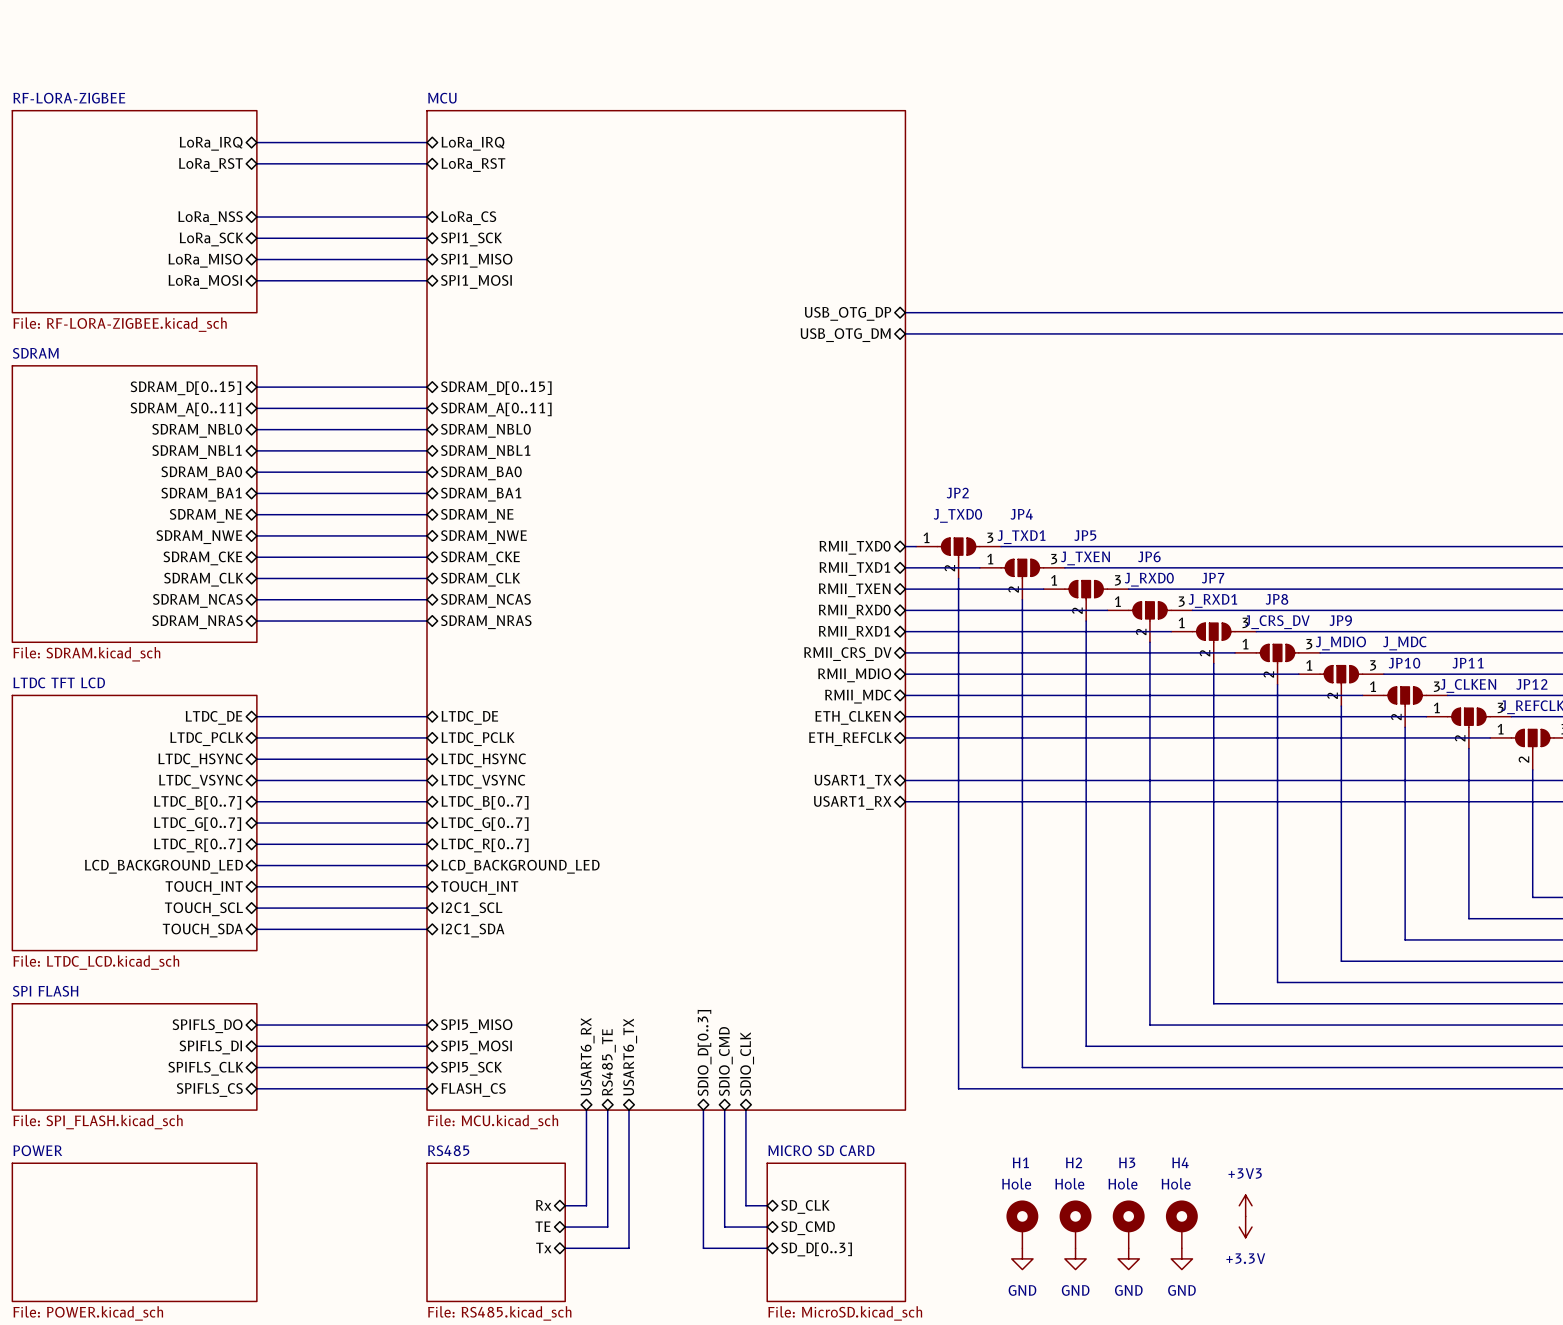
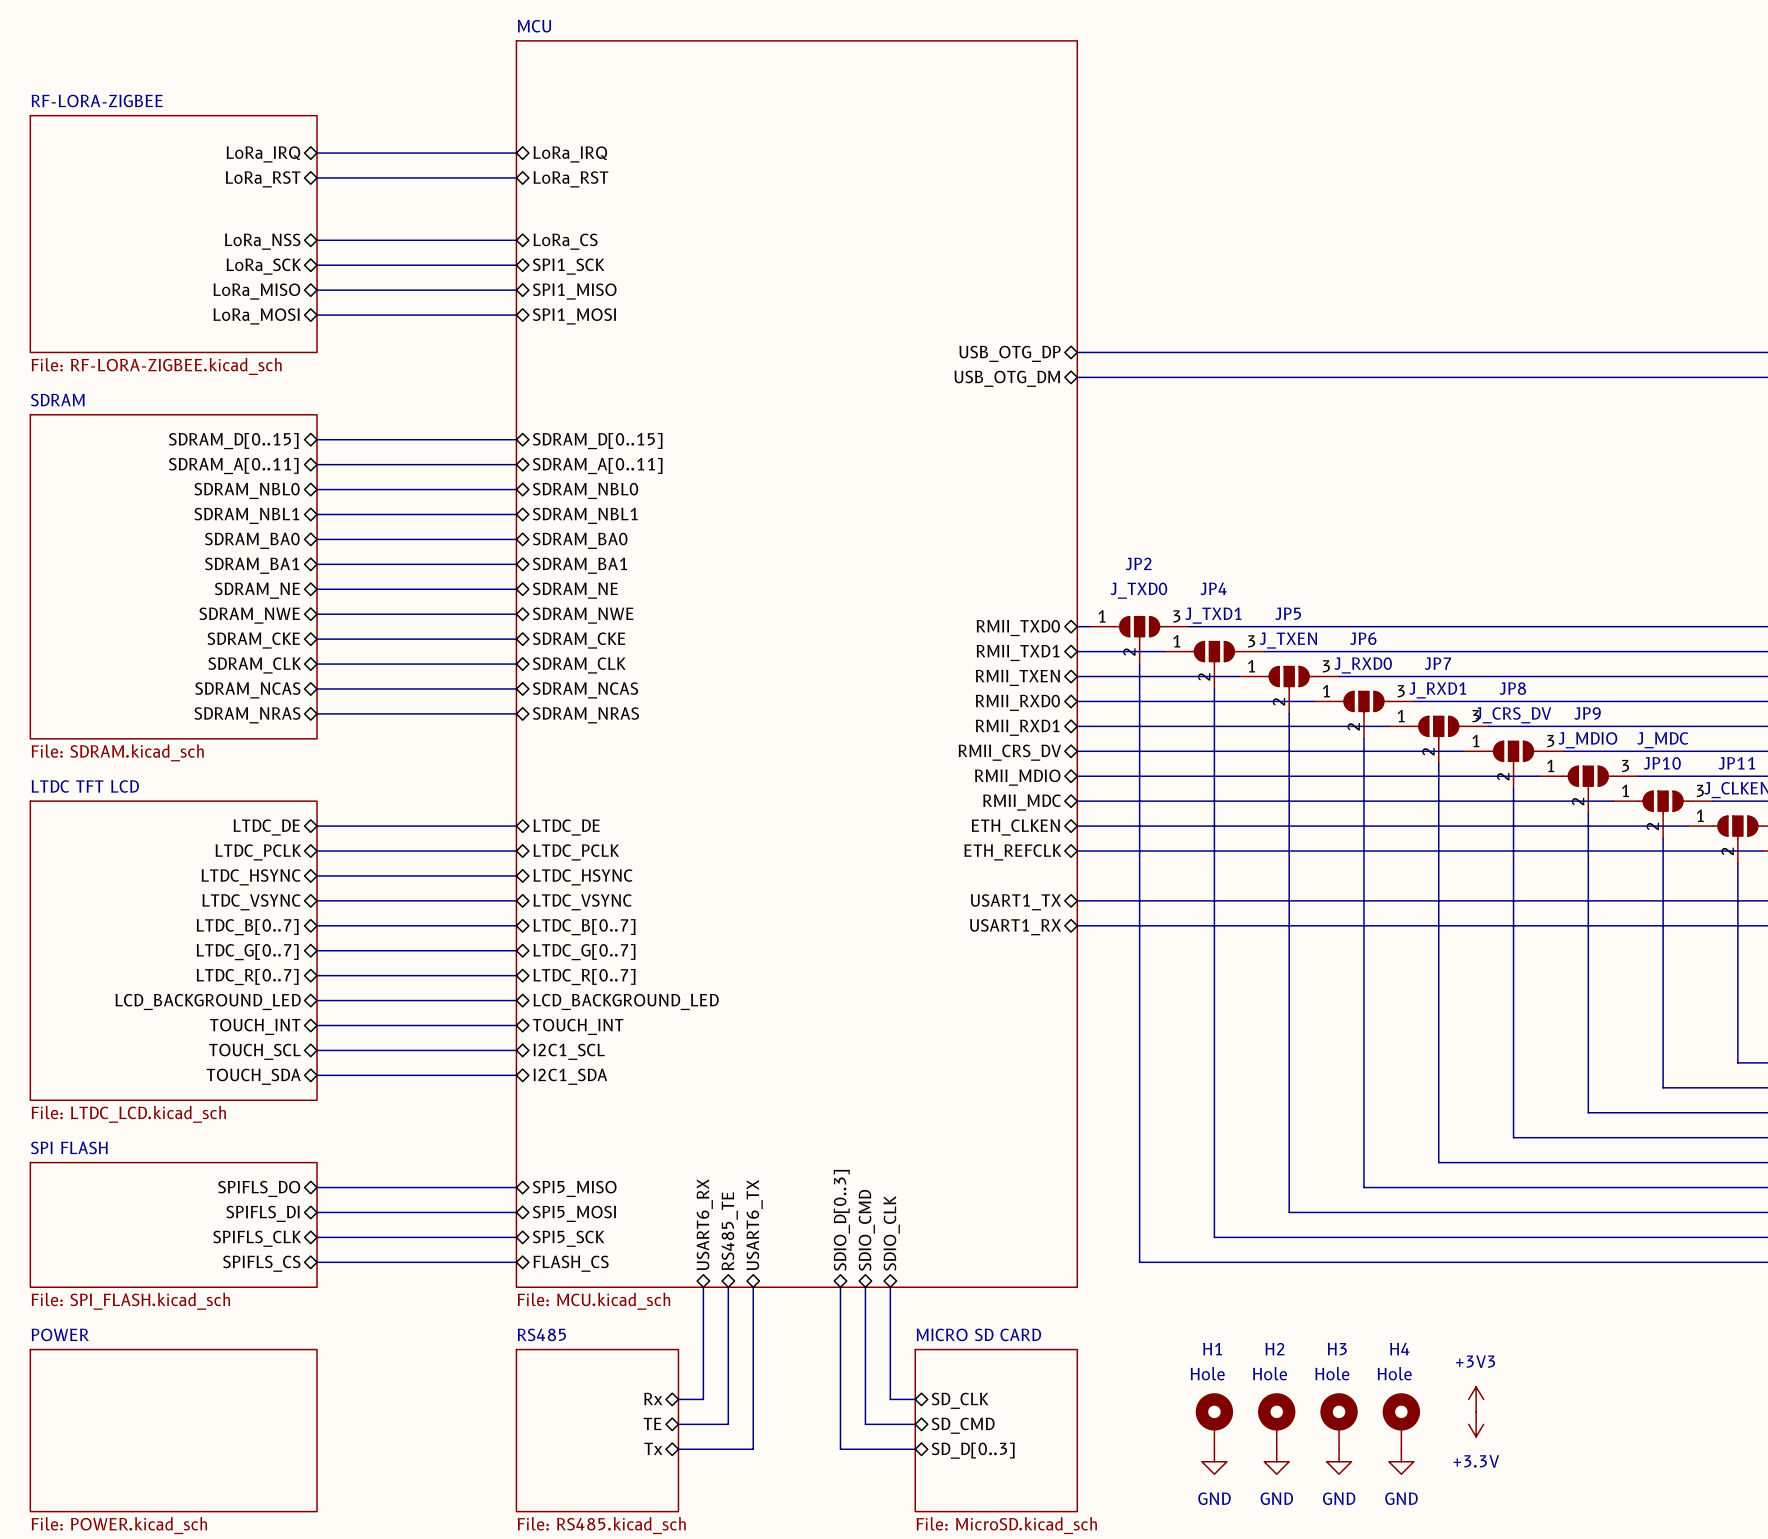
sheet MCU: none -> File: MCU.kicad_sch (796, 664)
sheet MCU: File: MCU.kicad_sch (666, 610) -> none

